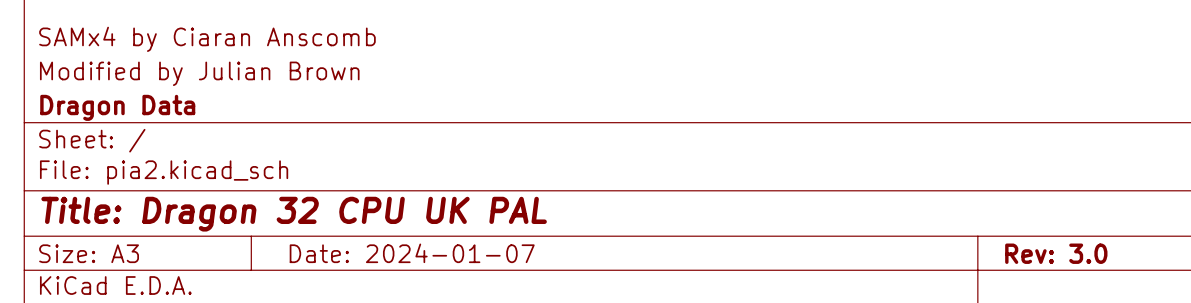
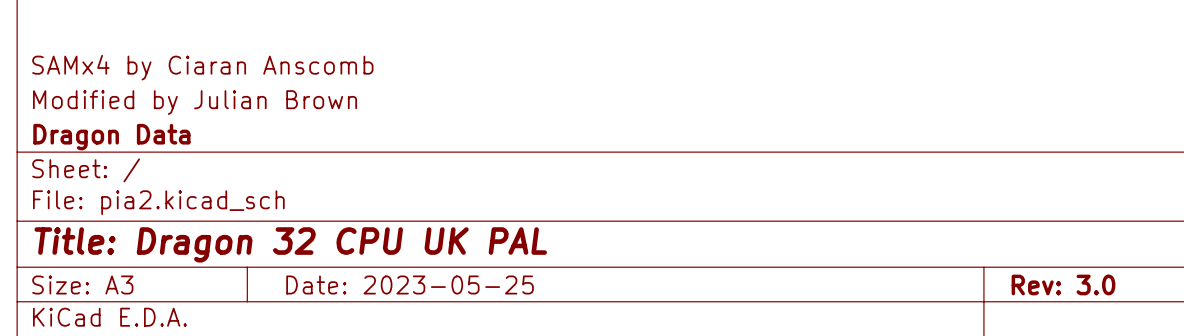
title block: Date: 2024-01-07 (412, 253) -> Date: 2023-05-25 (410, 284)

